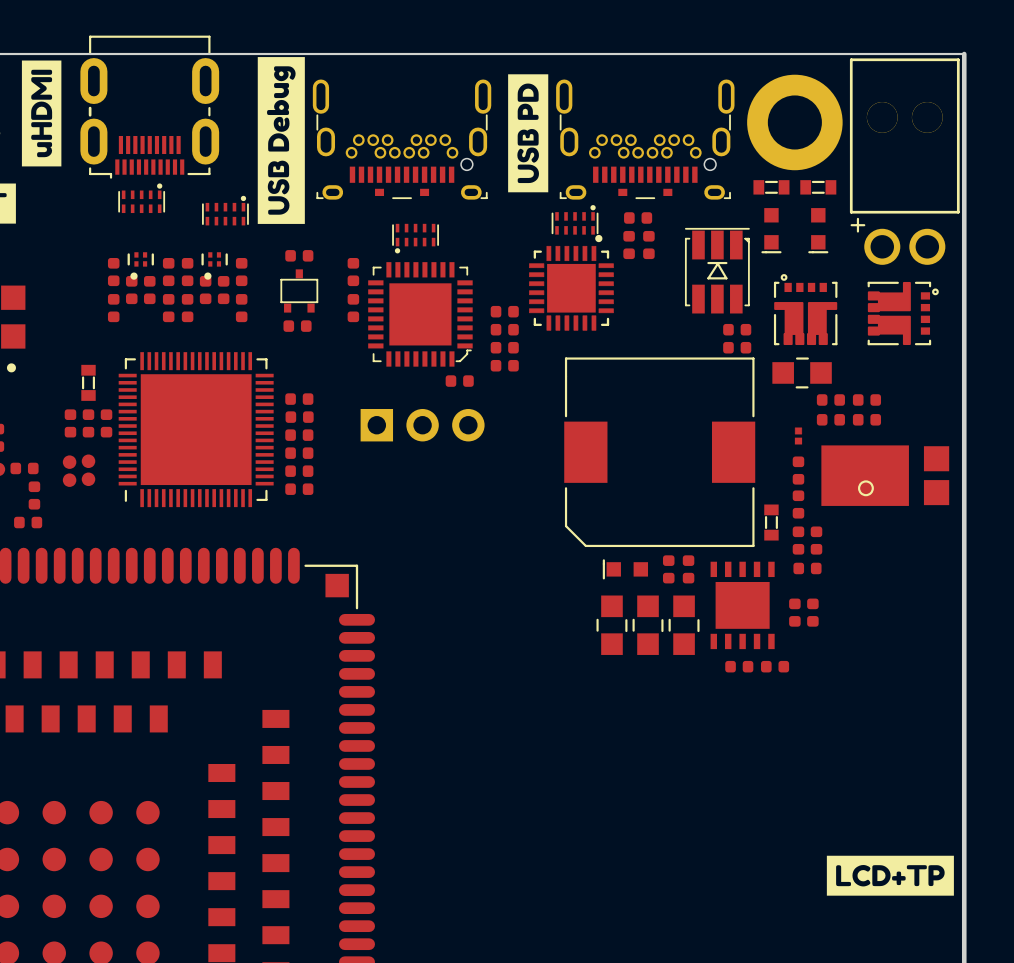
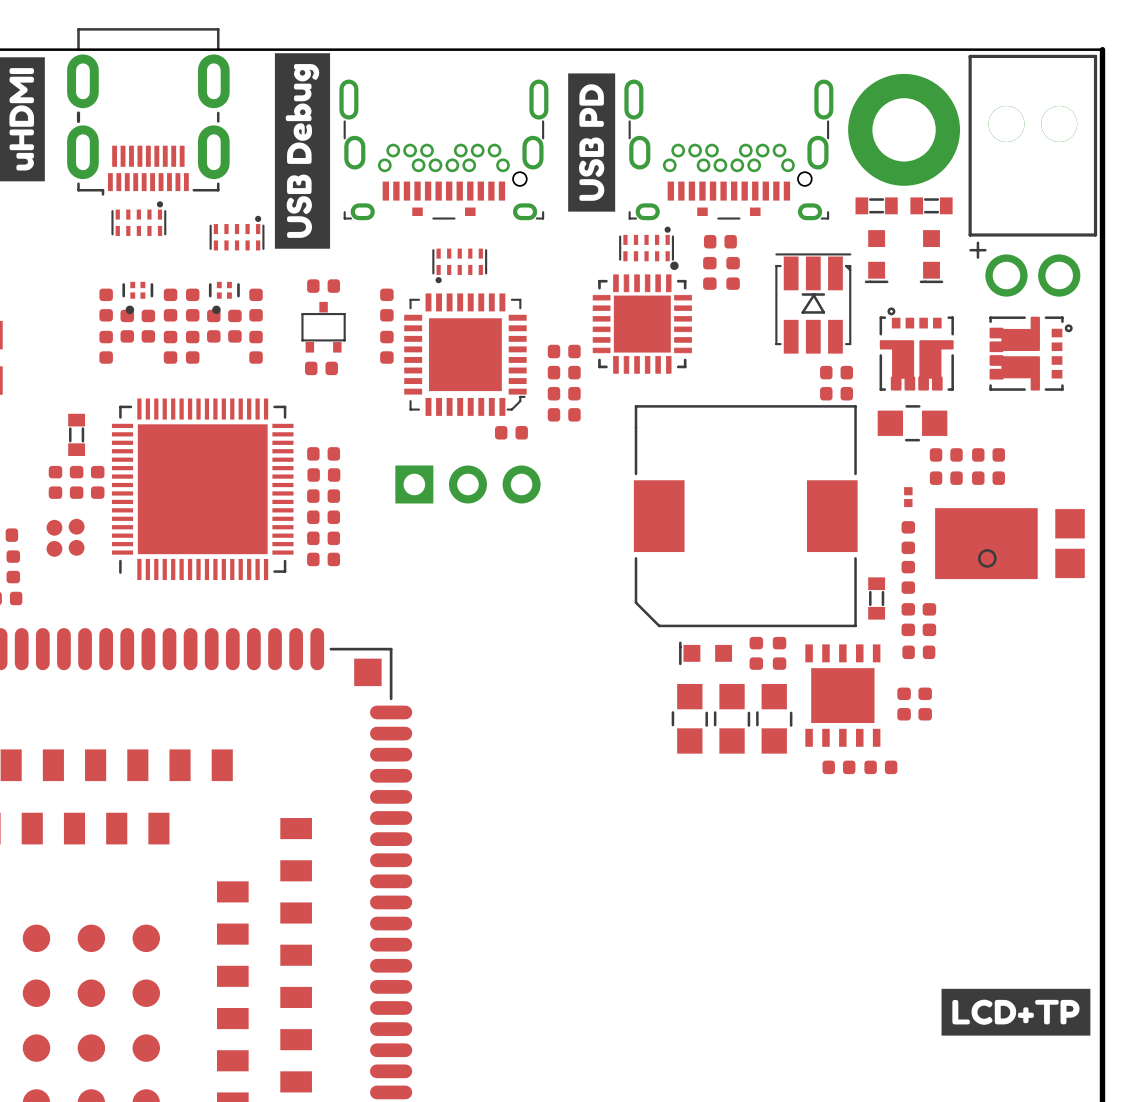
part footprint: [118, 352, 274, 508] -> [111, 398, 294, 581]

